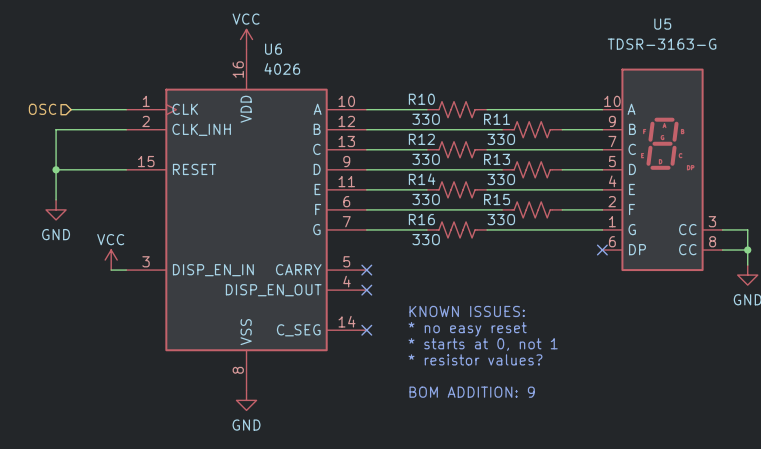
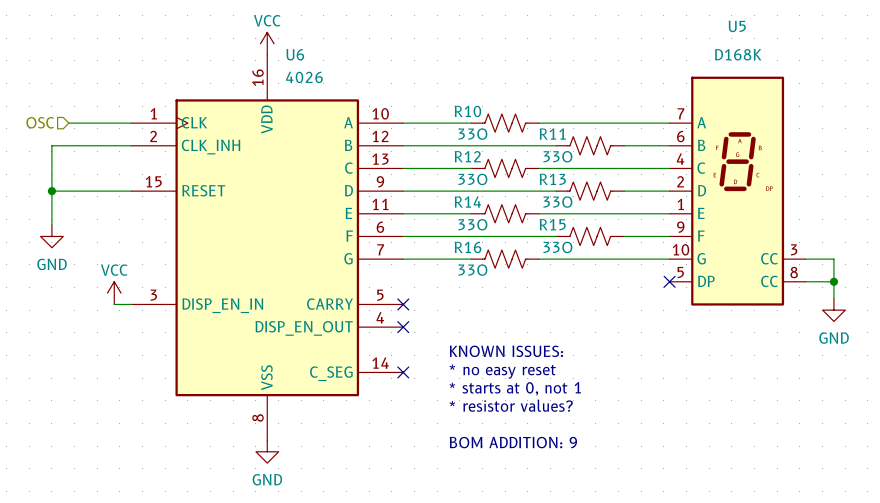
U5 value: TDSR-3163-G (662, 44) -> D168K (738, 54)
U5 pin number: 10 (612, 101) -> 7 (680, 113)
U5 pin number: 9 (612, 121) -> 6 (680, 136)
U5 pin number: 7 (612, 141) -> 4 (680, 159)
U5 pin number: 5 (612, 161) -> 2 (680, 181)
U5 pin number: 4 (612, 181) -> 1 (680, 204)
U5 pin number: 2 (612, 201) -> 9 (680, 227)
U5 pin number: 1 (612, 221) -> 10 (680, 249)
U5 pin number: 6 (612, 241) -> 5 (680, 272)

